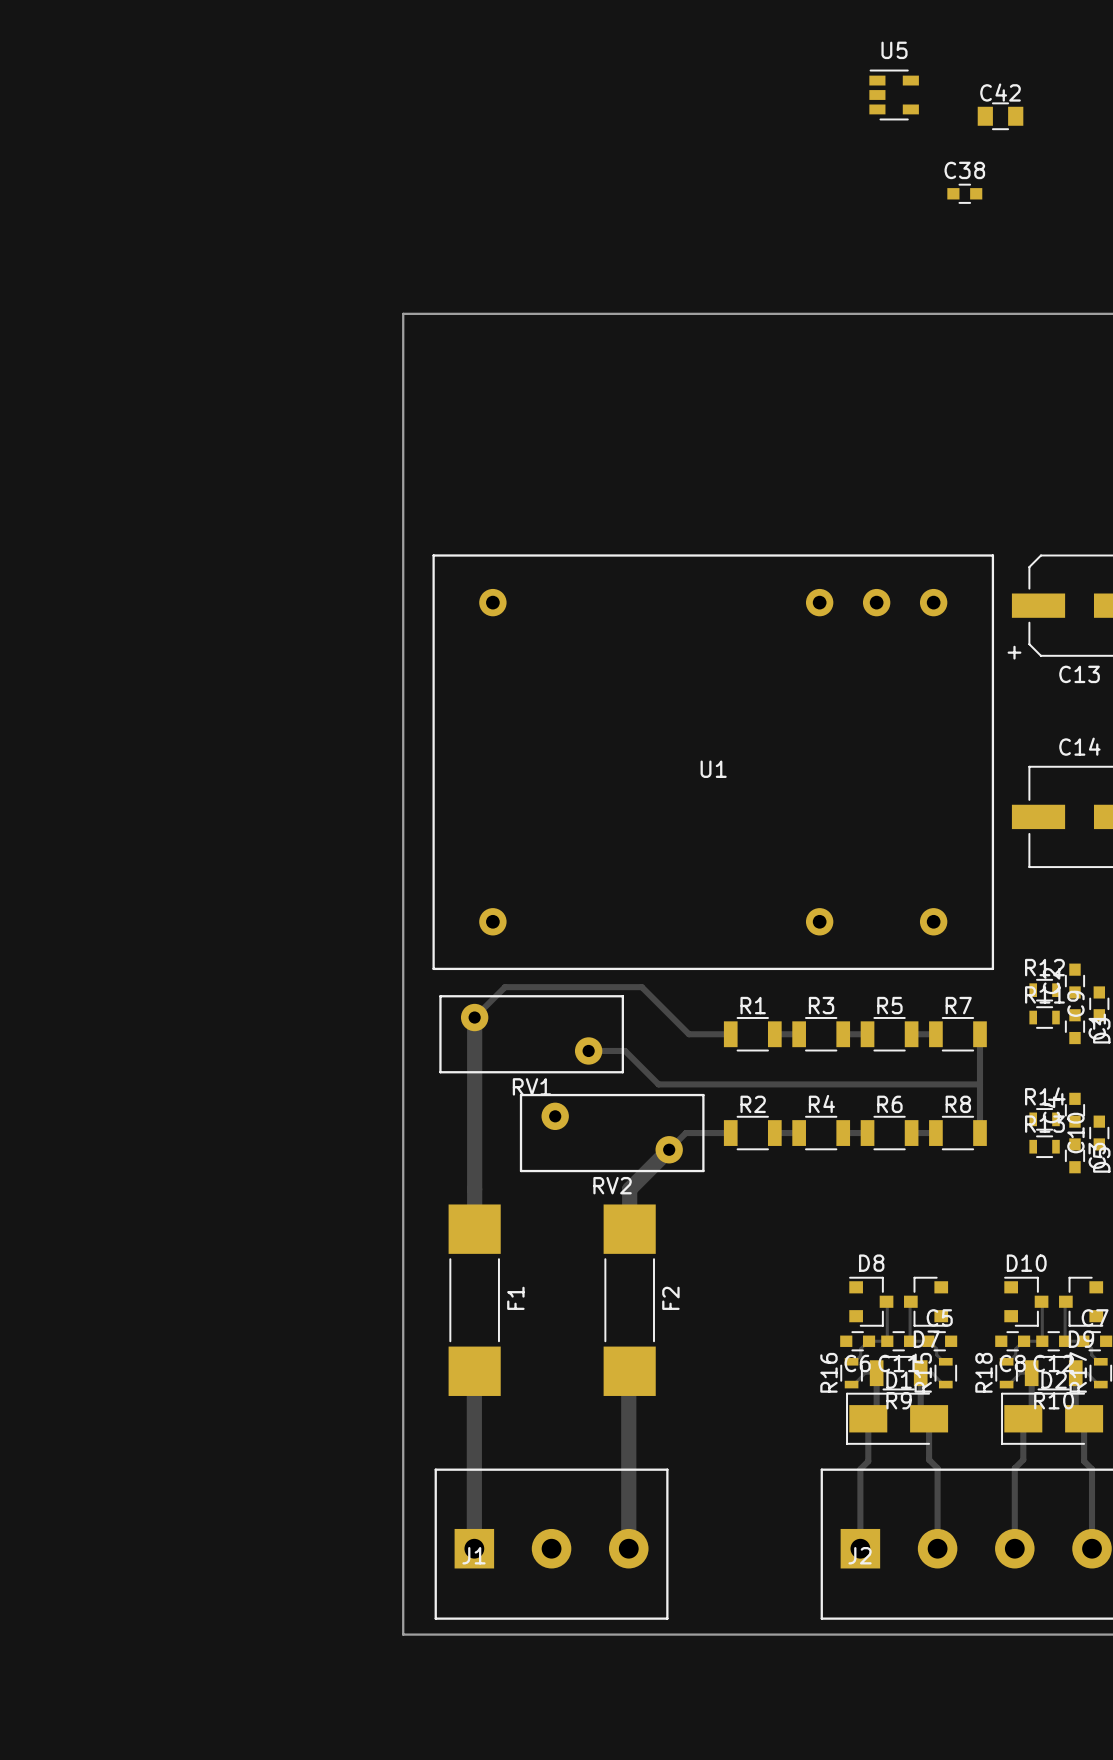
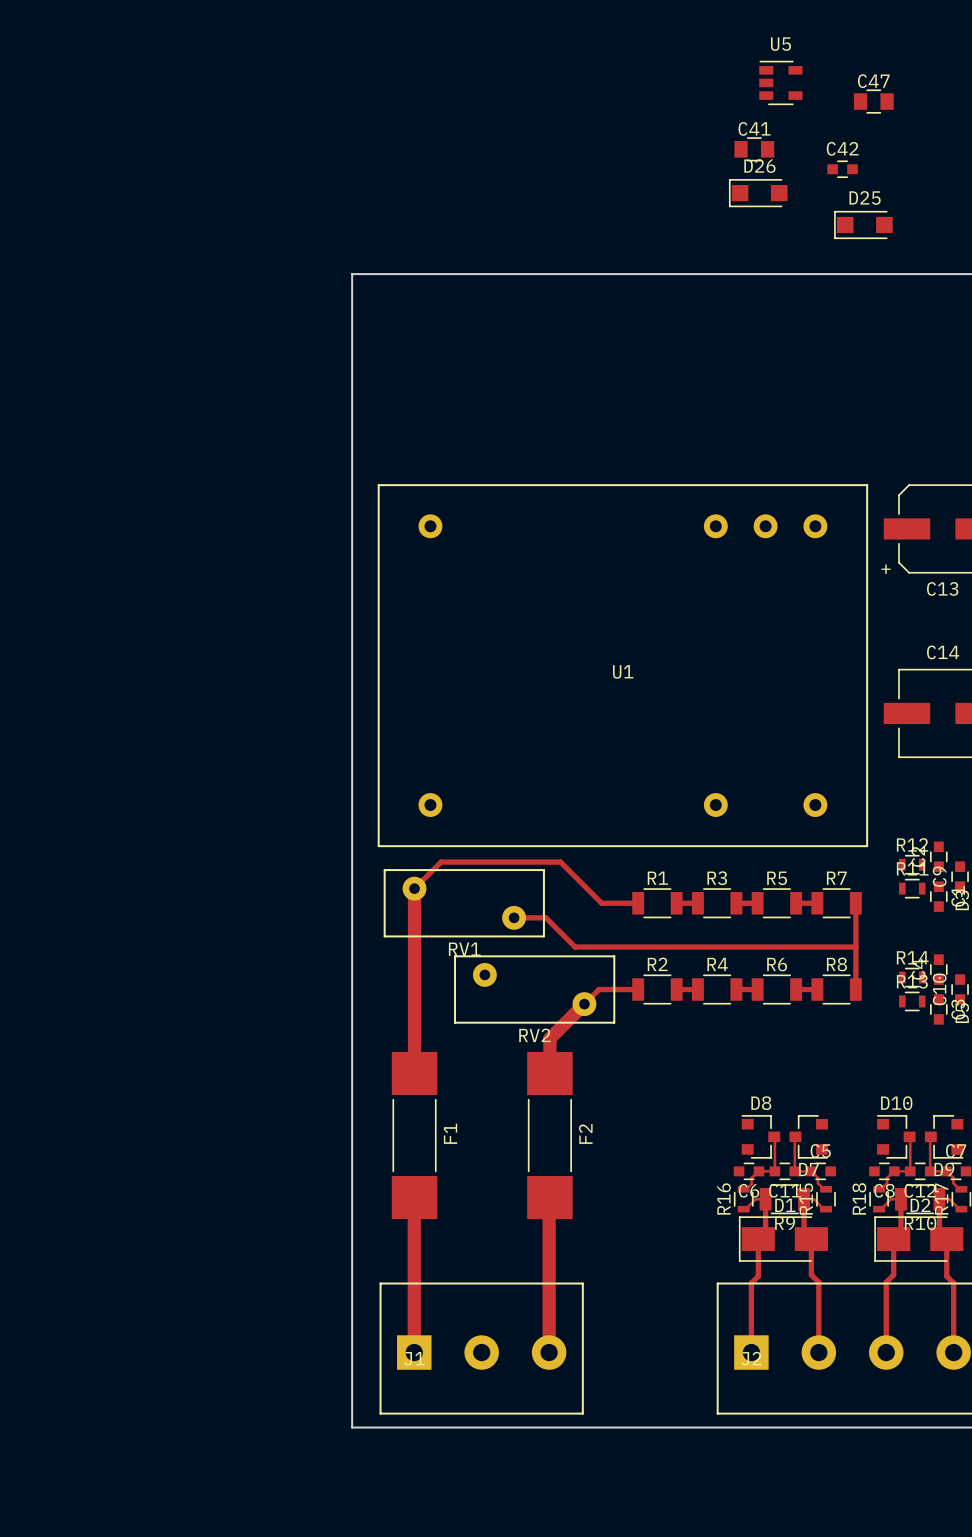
C42 name: C42 (1000, 92) -> C47 (873, 81)
C41: none -> (754, 149)
C38 name: C38 (964, 170) -> C42 (842, 148)
D26: none -> (758, 193)
D25: none -> (863, 224)

